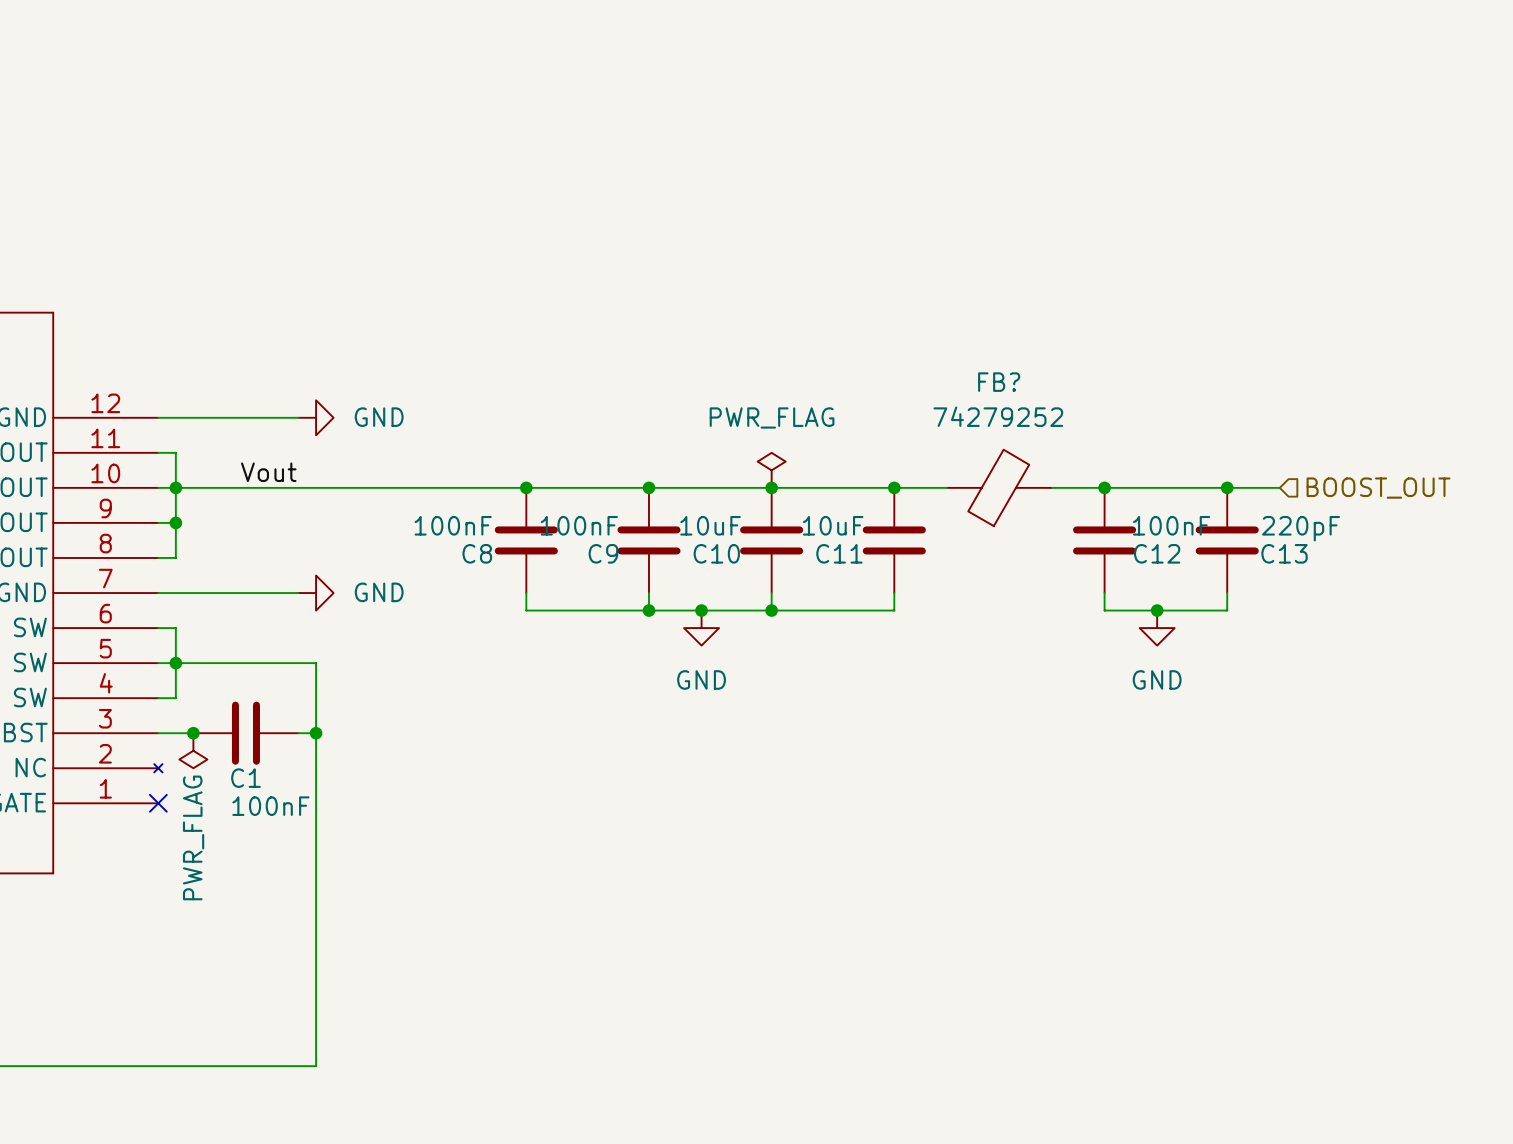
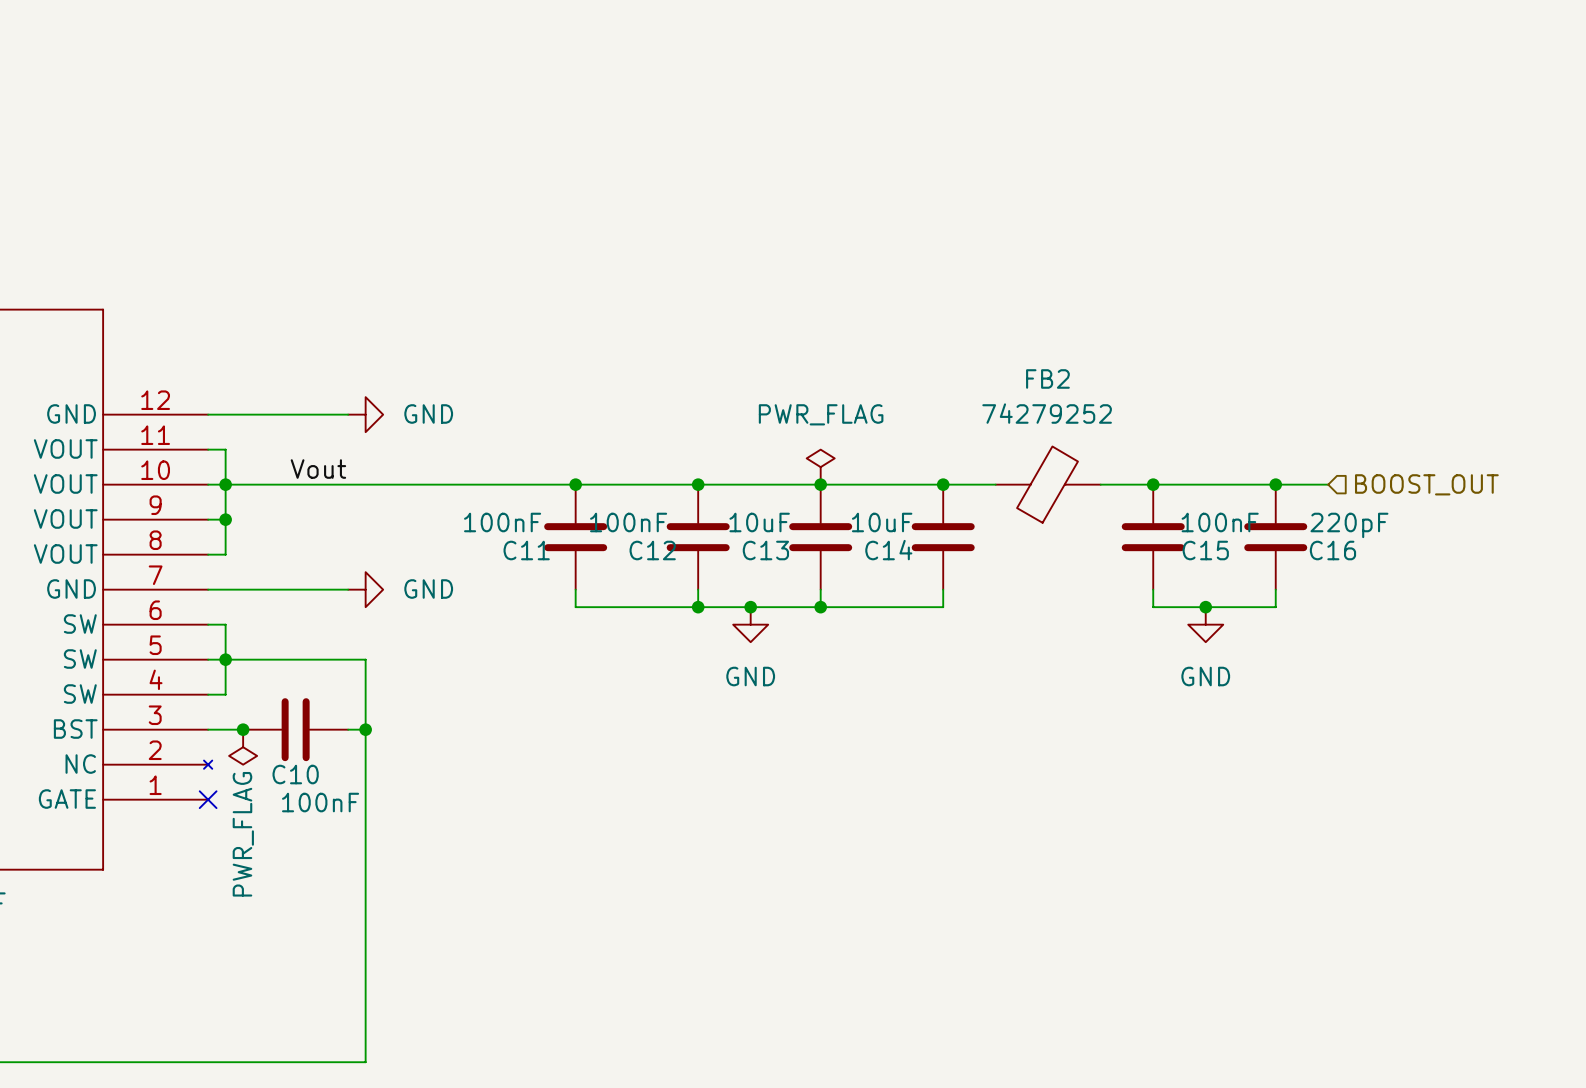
FB? name: FB? (999, 382) -> FB2 (1047, 378)
C8 name: C8 (477, 553) -> C11 (526, 550)
C9 name: C9 (603, 553) -> C12 (652, 550)
C10 name: C10 (716, 553) -> C13 (765, 550)
C11 name: C11 (839, 553) -> C14 (888, 550)
C12 name: C12 (1157, 553) -> C15 (1205, 550)
C13 name: C13 (1284, 553) -> C16 (1332, 550)
C1 name: C1 (245, 778) -> C10 (295, 774)

